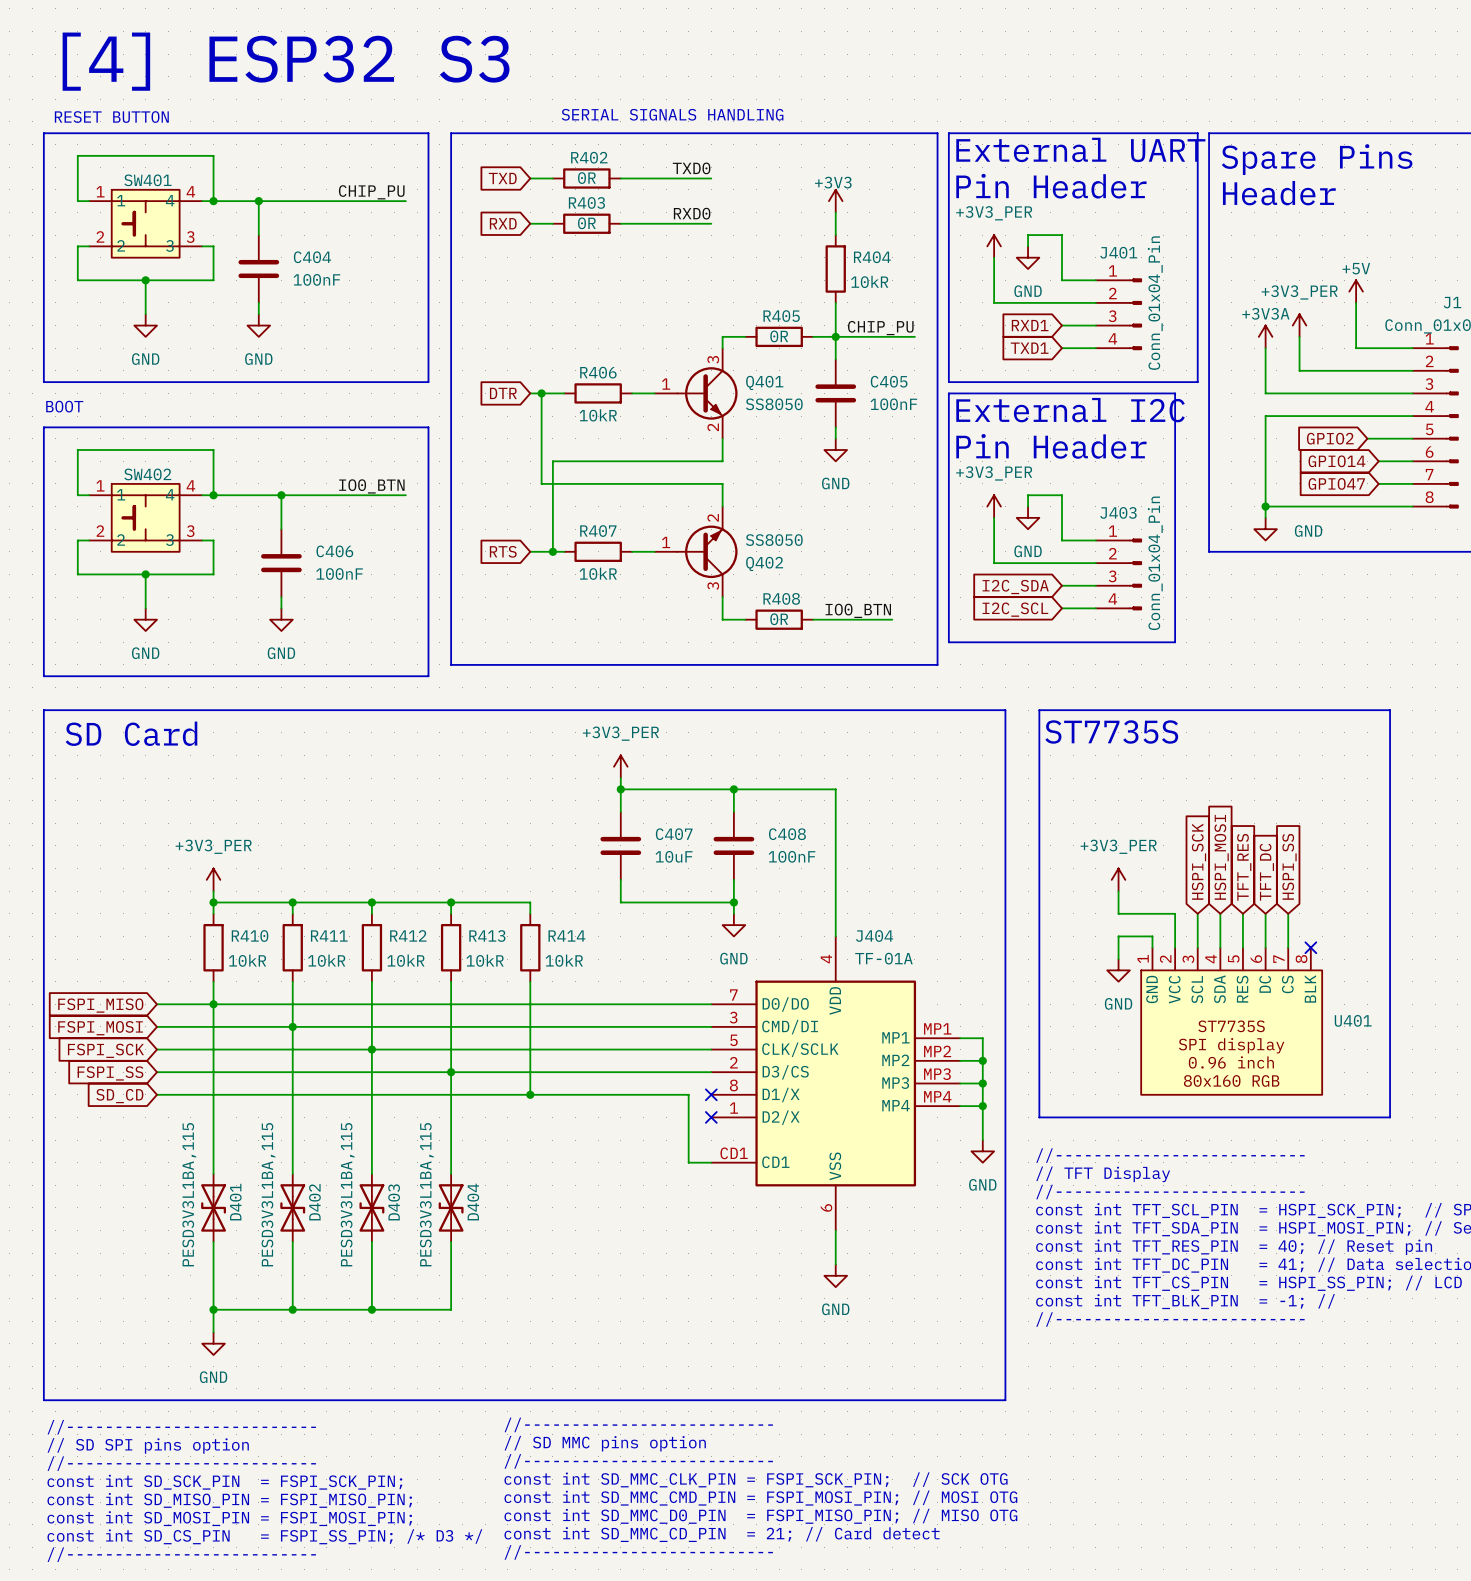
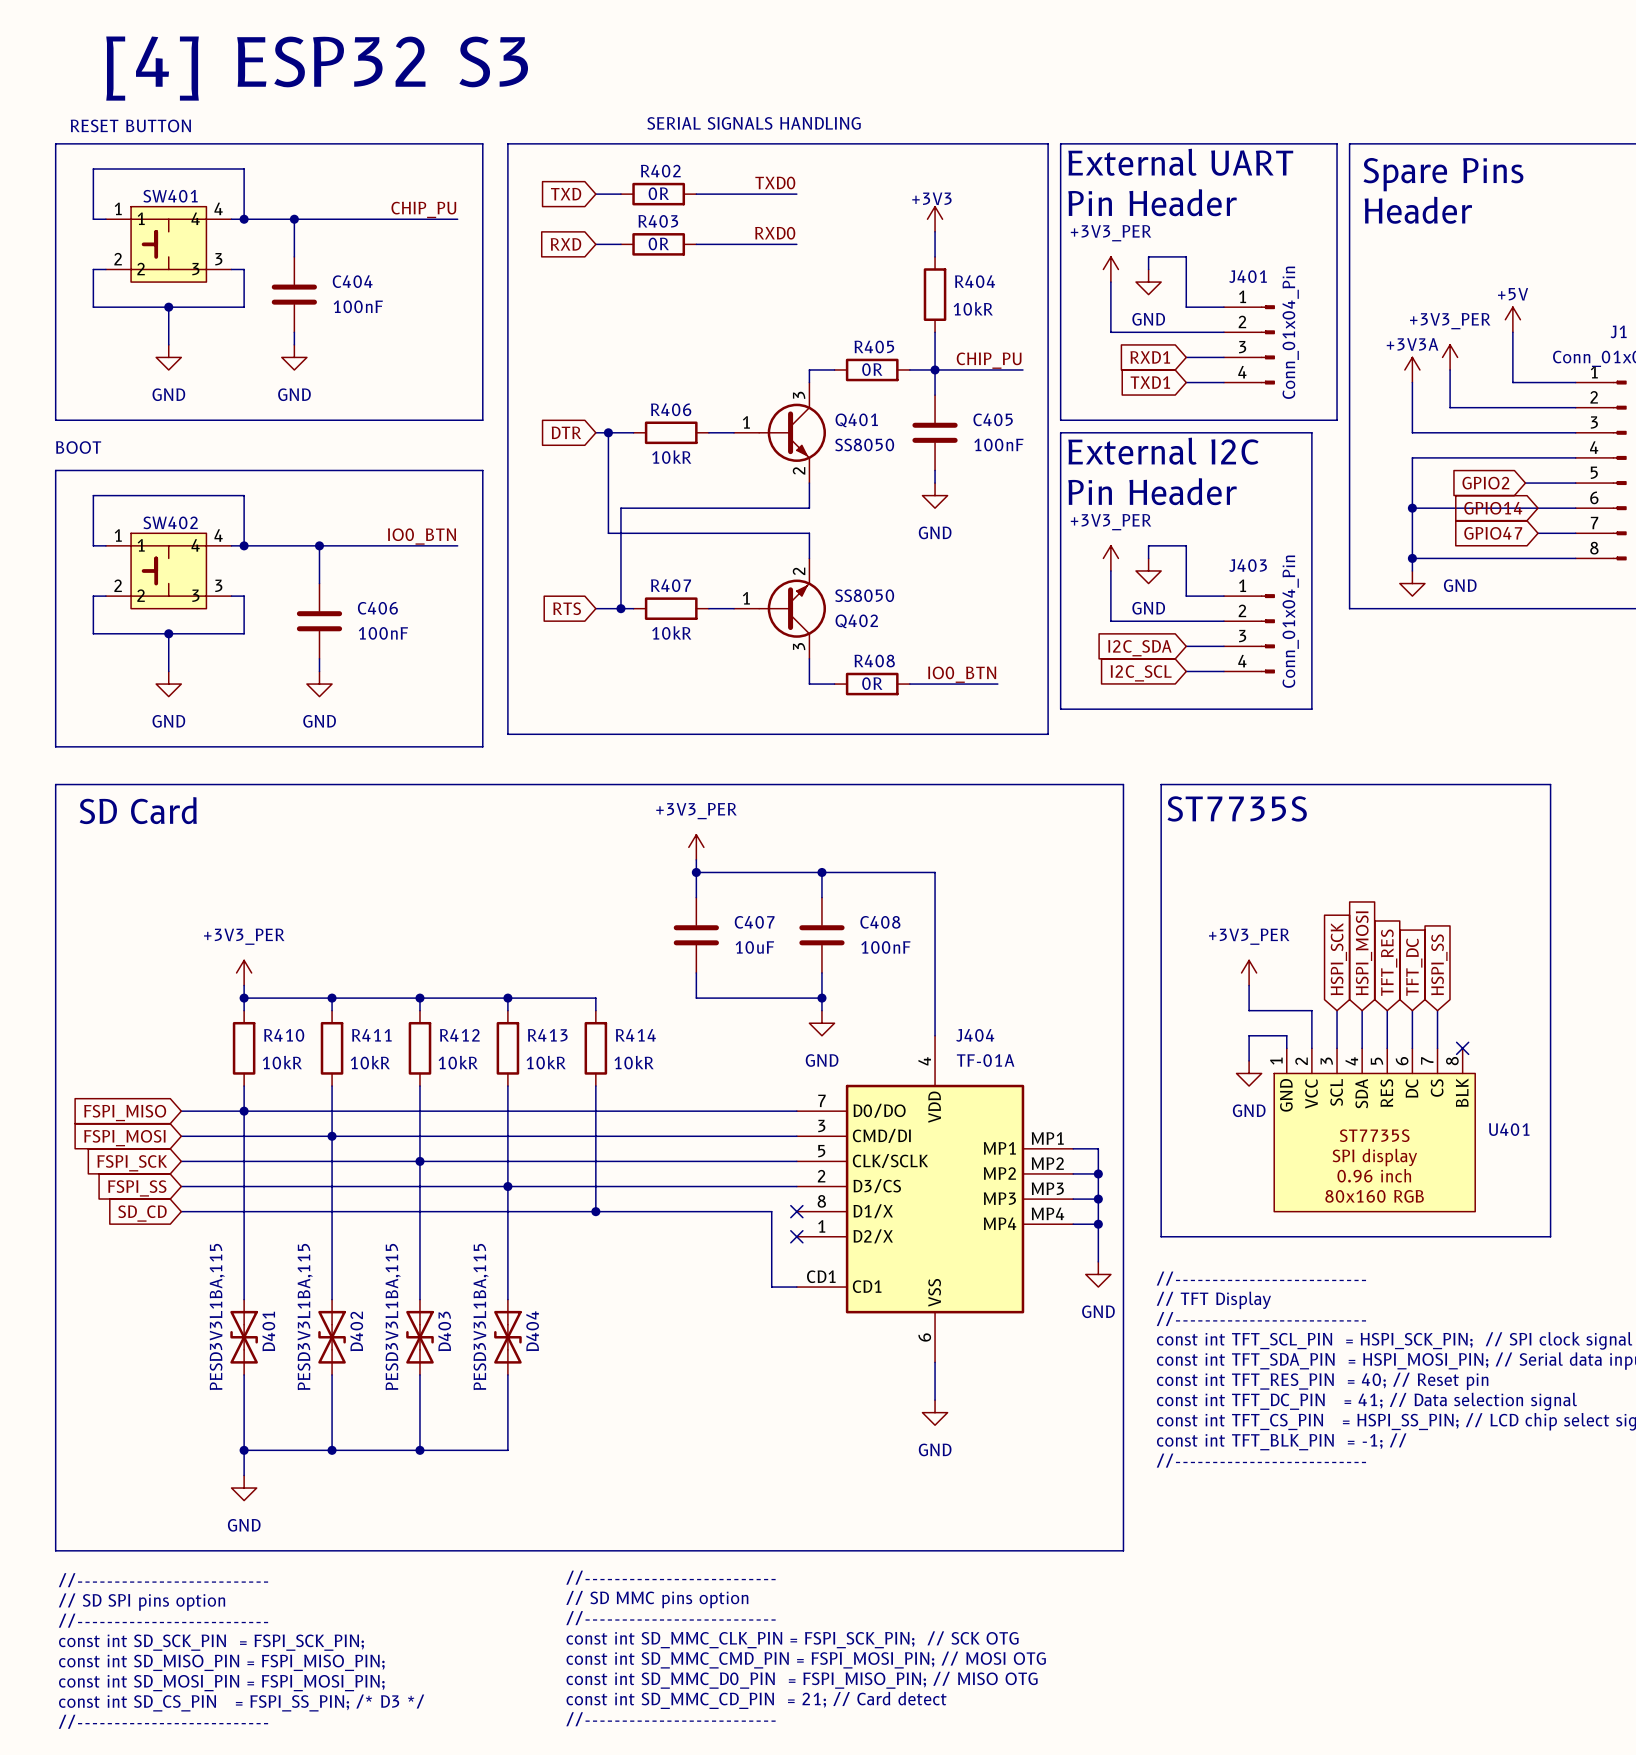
wire: none -> (1412, 508) (1538, 508)
junction: none -> (1412, 508)

